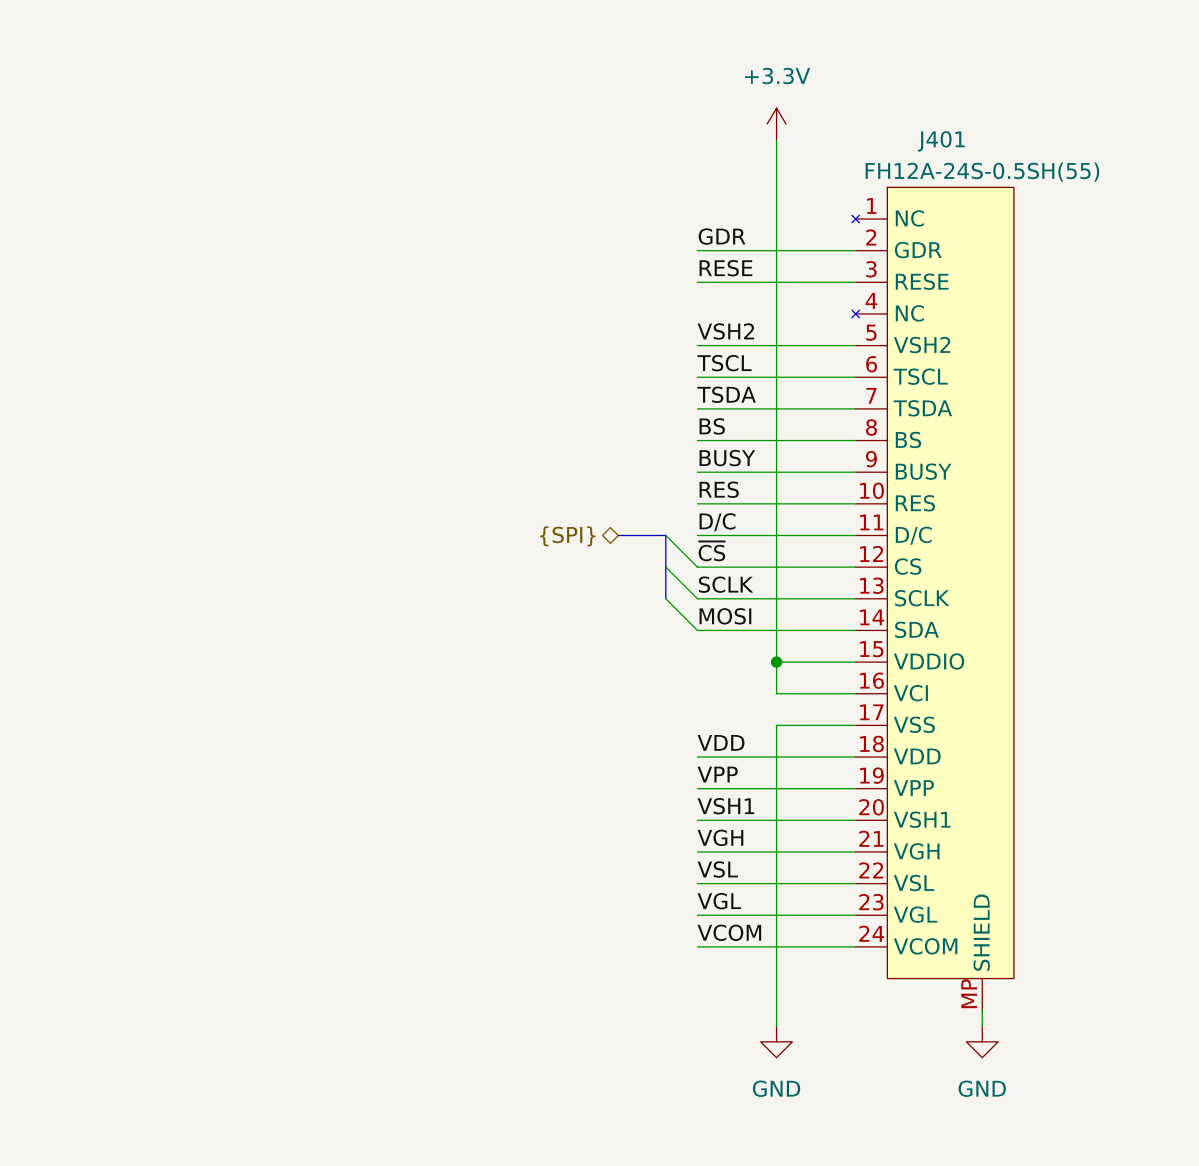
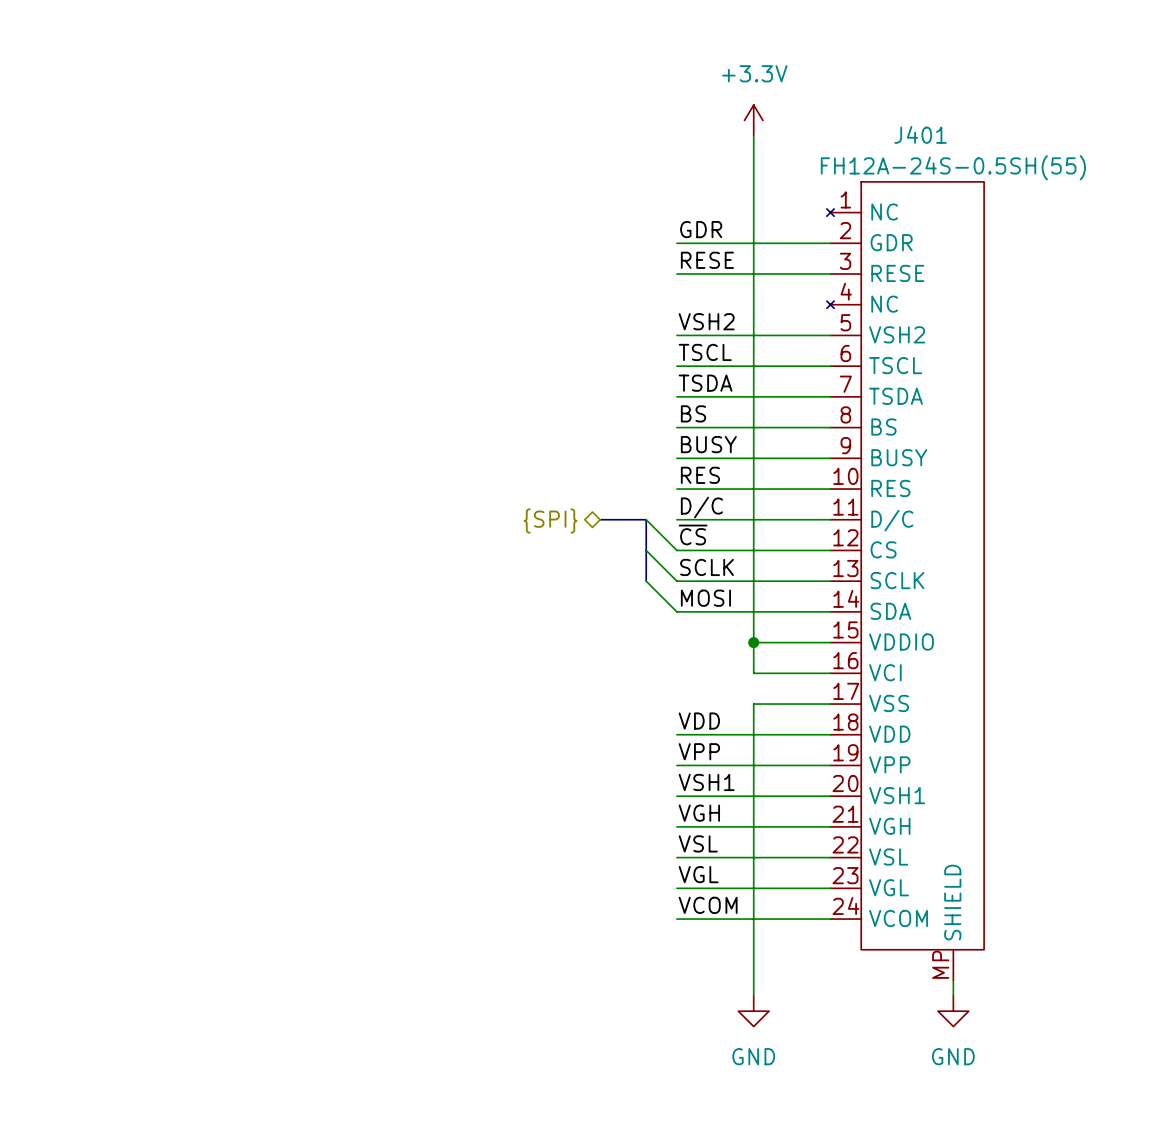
J401 symbol: [851, 187, 1014, 1011] -> [826, 181, 985, 981]

